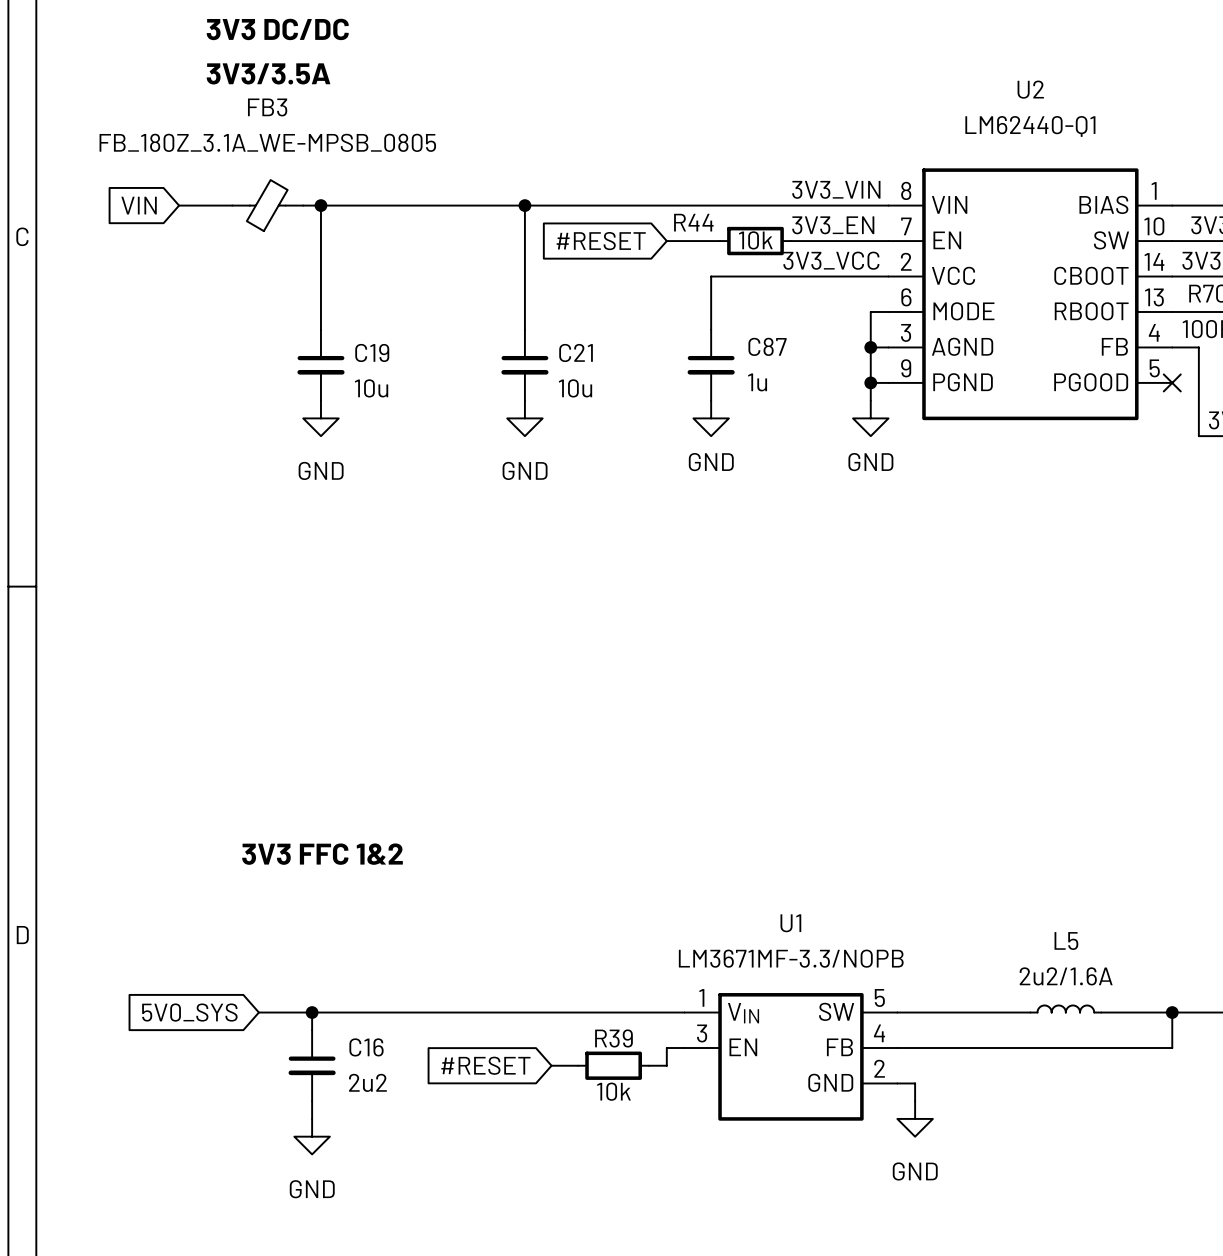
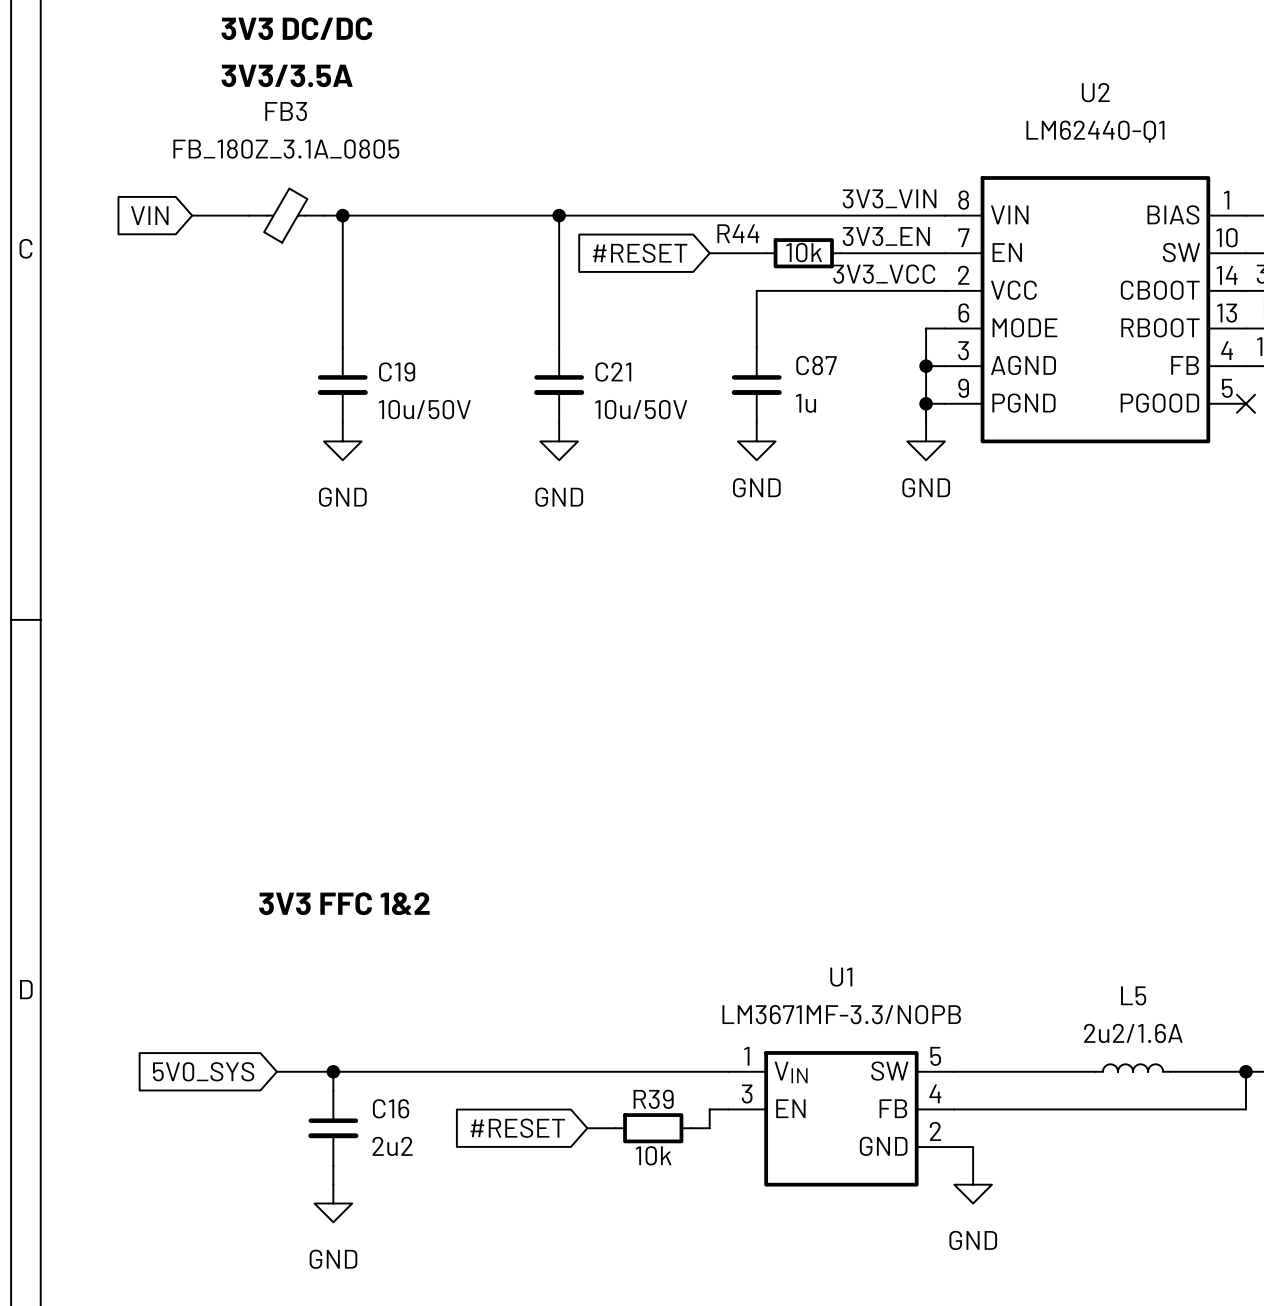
FB3 value: FB_180Z_3.1A_WE-MPSB_0805 (267, 142) -> FB_180Z_3.1A_0805 (286, 149)
C19 text: 10u (371, 388) -> 10u/50V (424, 409)
C21 text: 10u (575, 388) -> 10u/50V (641, 409)

